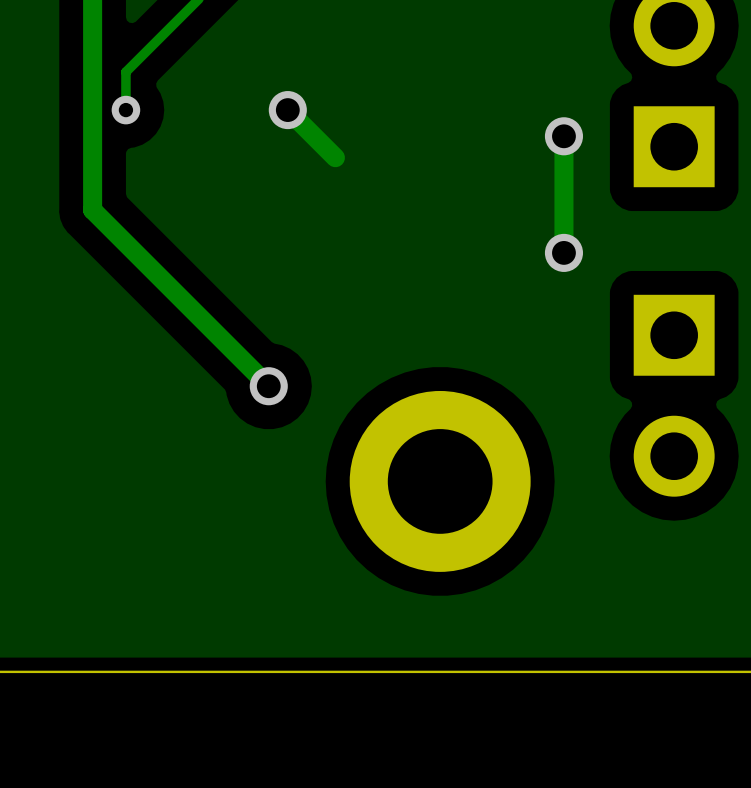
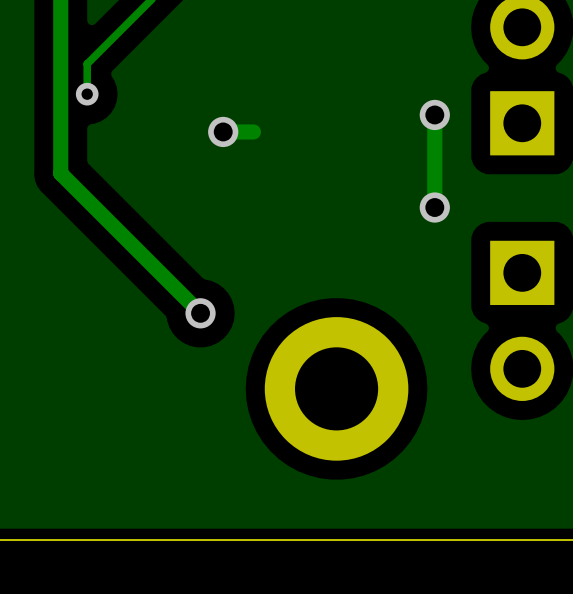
track: (287, 110) (335, 157) -> (223, 131) (253, 131)
via position: (287, 110) -> (223, 131)

